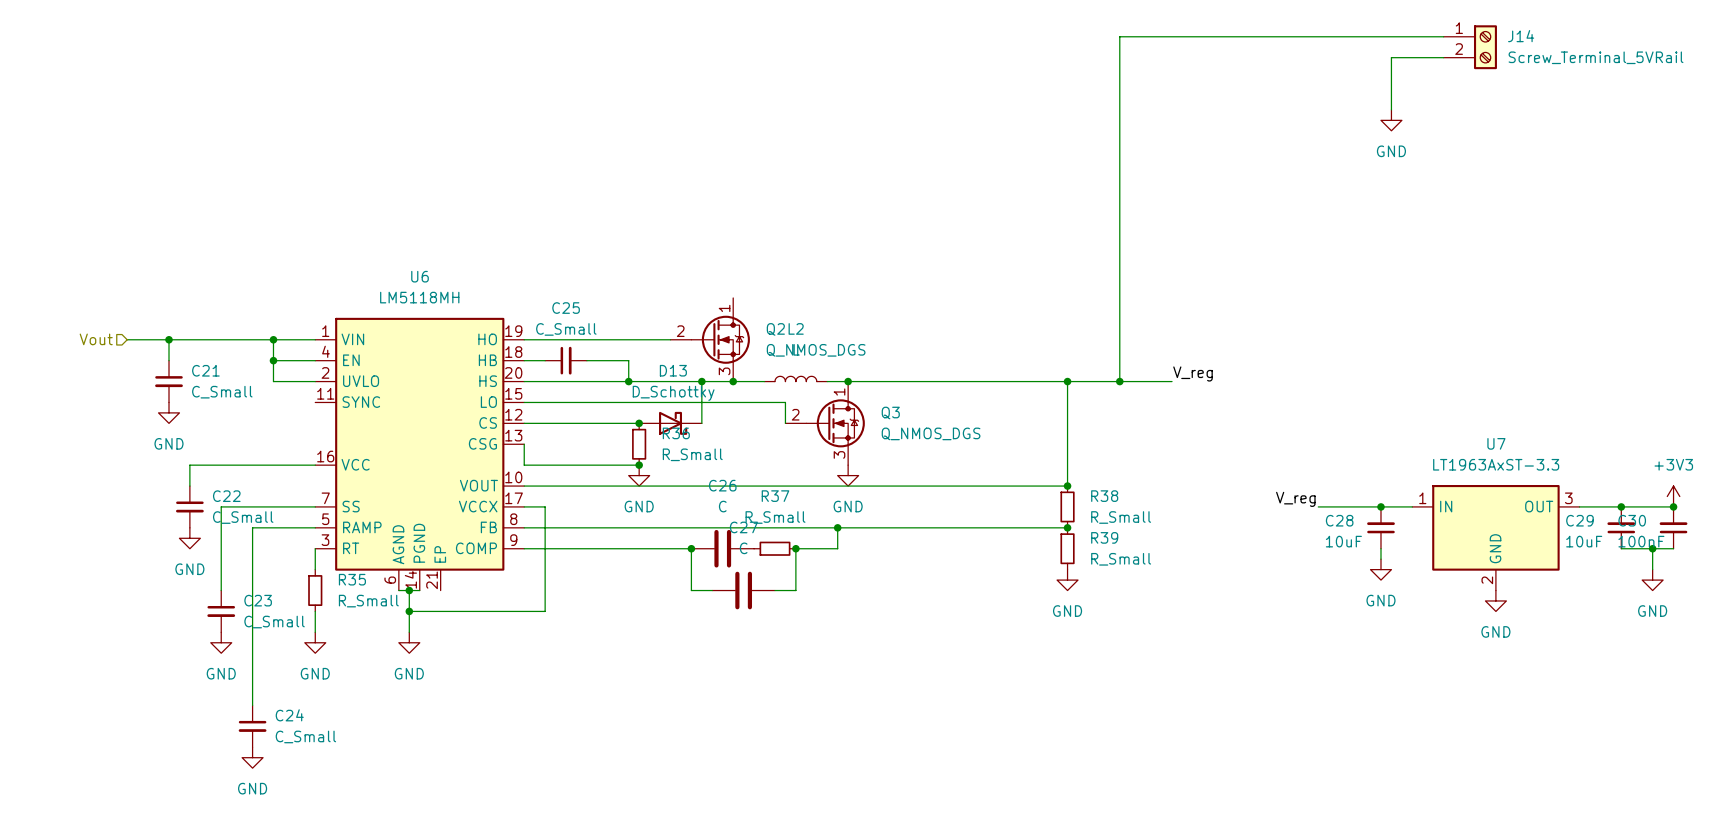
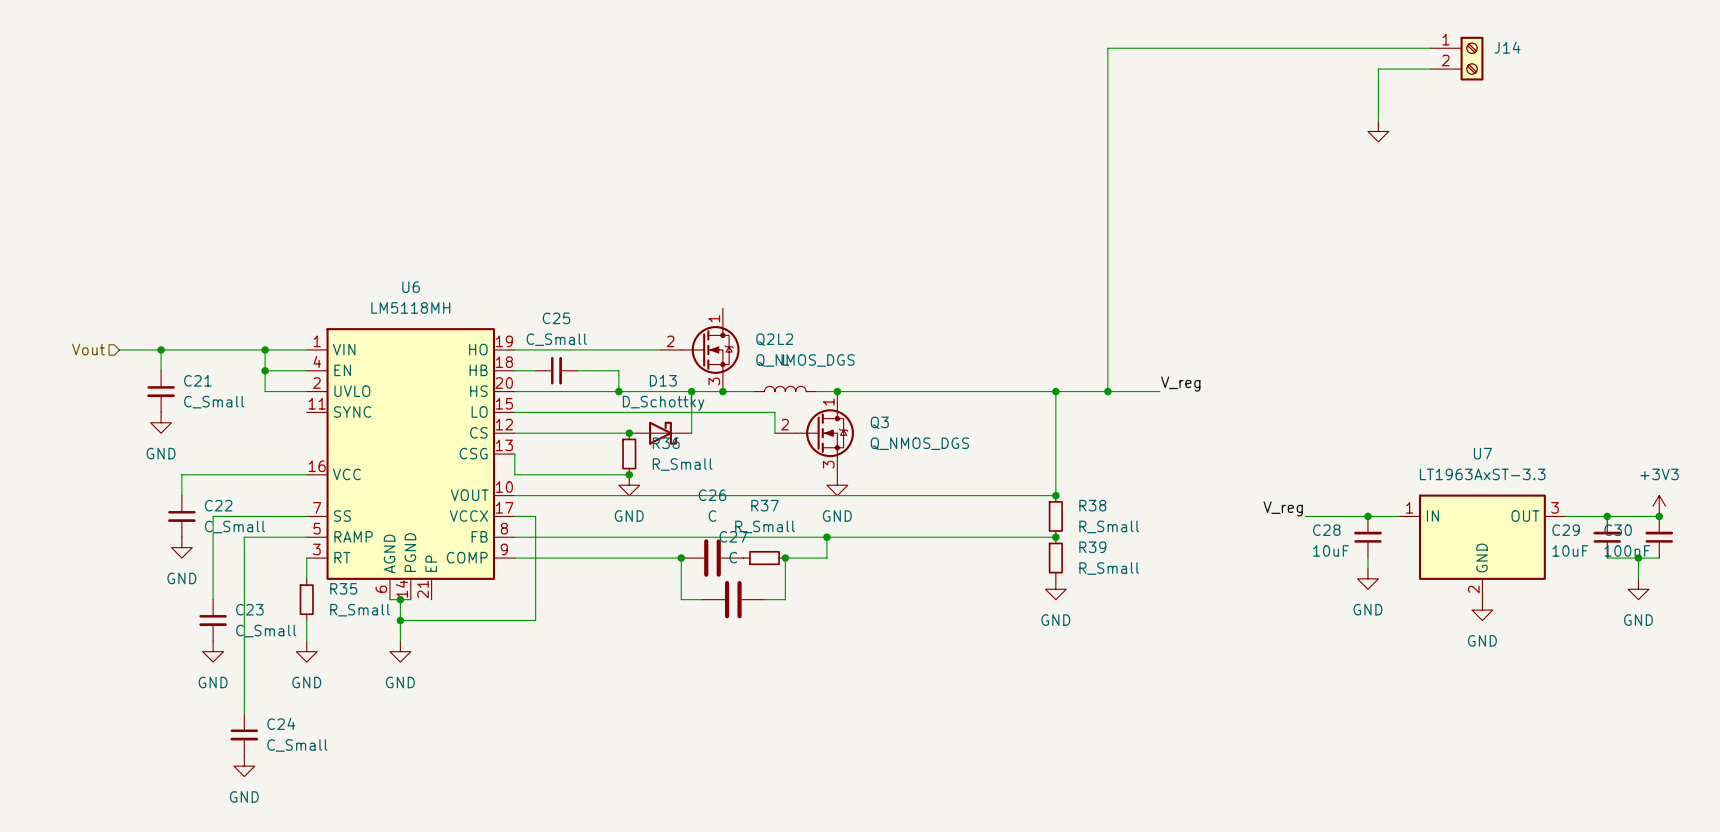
J14 value: Screw_Terminal_5VRail (1596, 57) -> none
power symbol text: GND (1391, 151) -> none

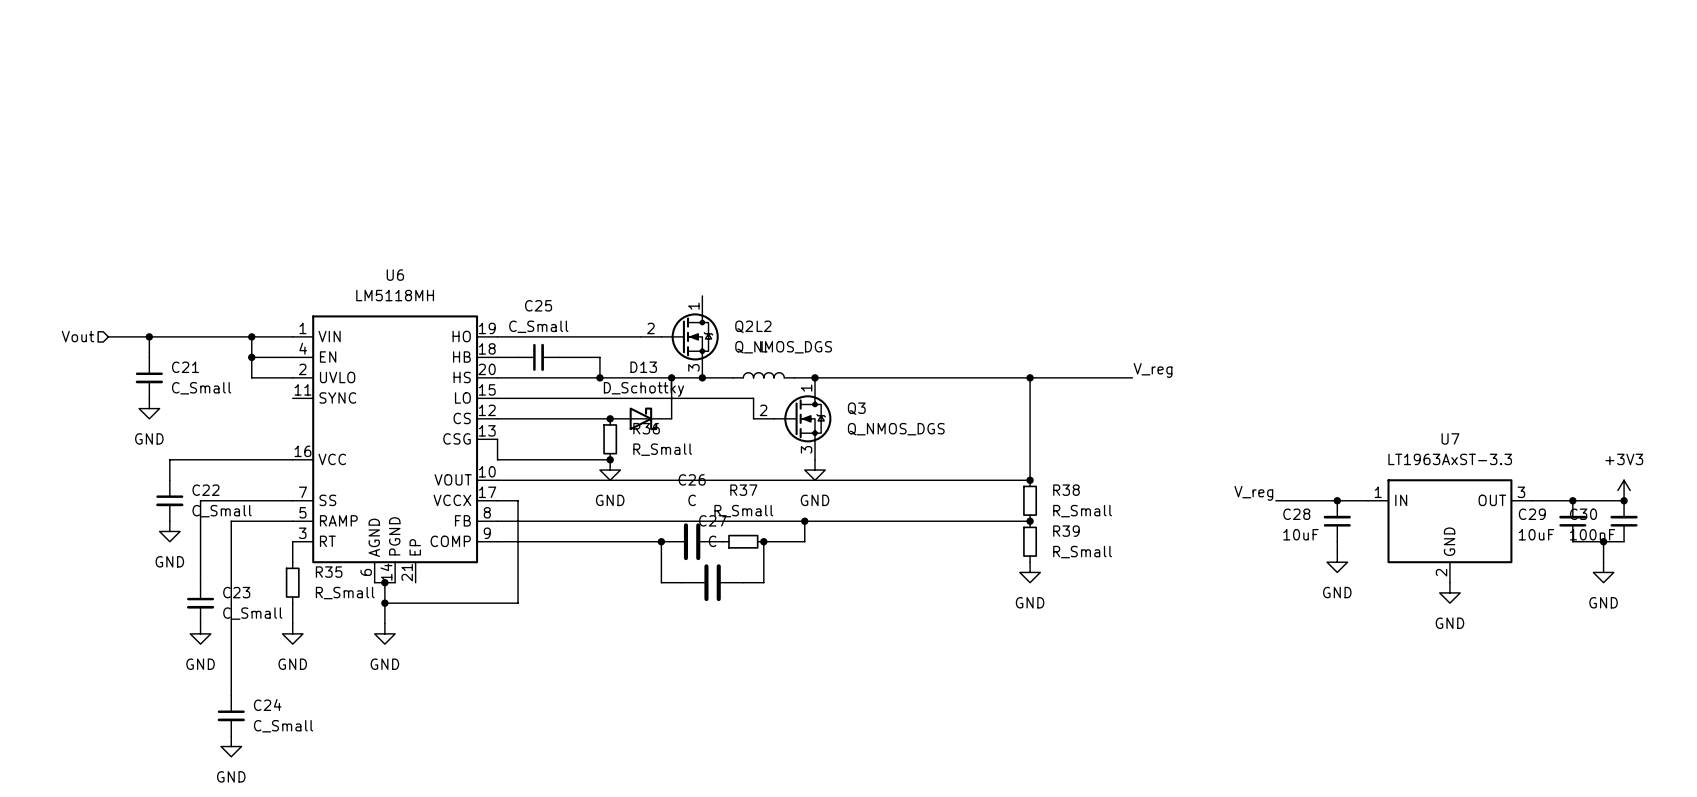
wire: (1430, 48) (1107, 48) (1107, 391) -> none
J14: (1456, 58) -> none
wire: (1430, 69) (1378, 69) (1378, 121) -> none
power symbol: (1378, 131) -> none
junction: (1107, 391) -> none

